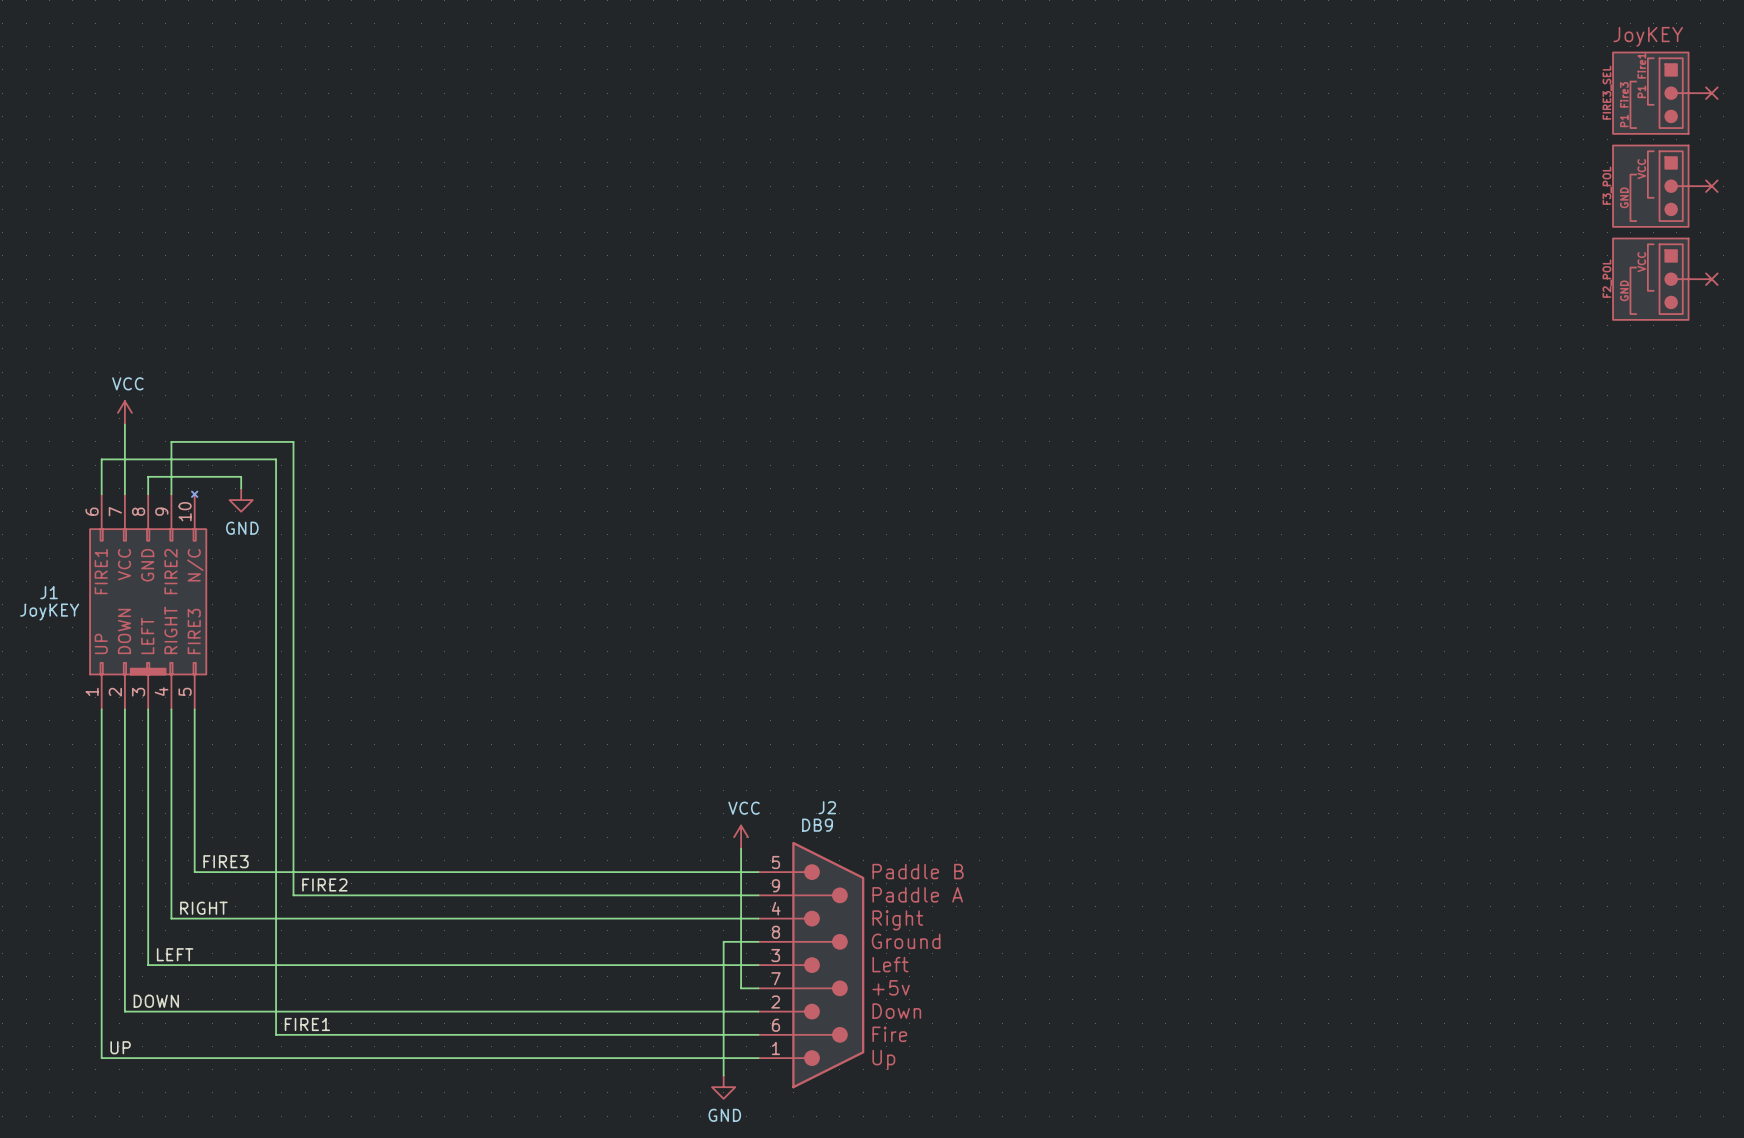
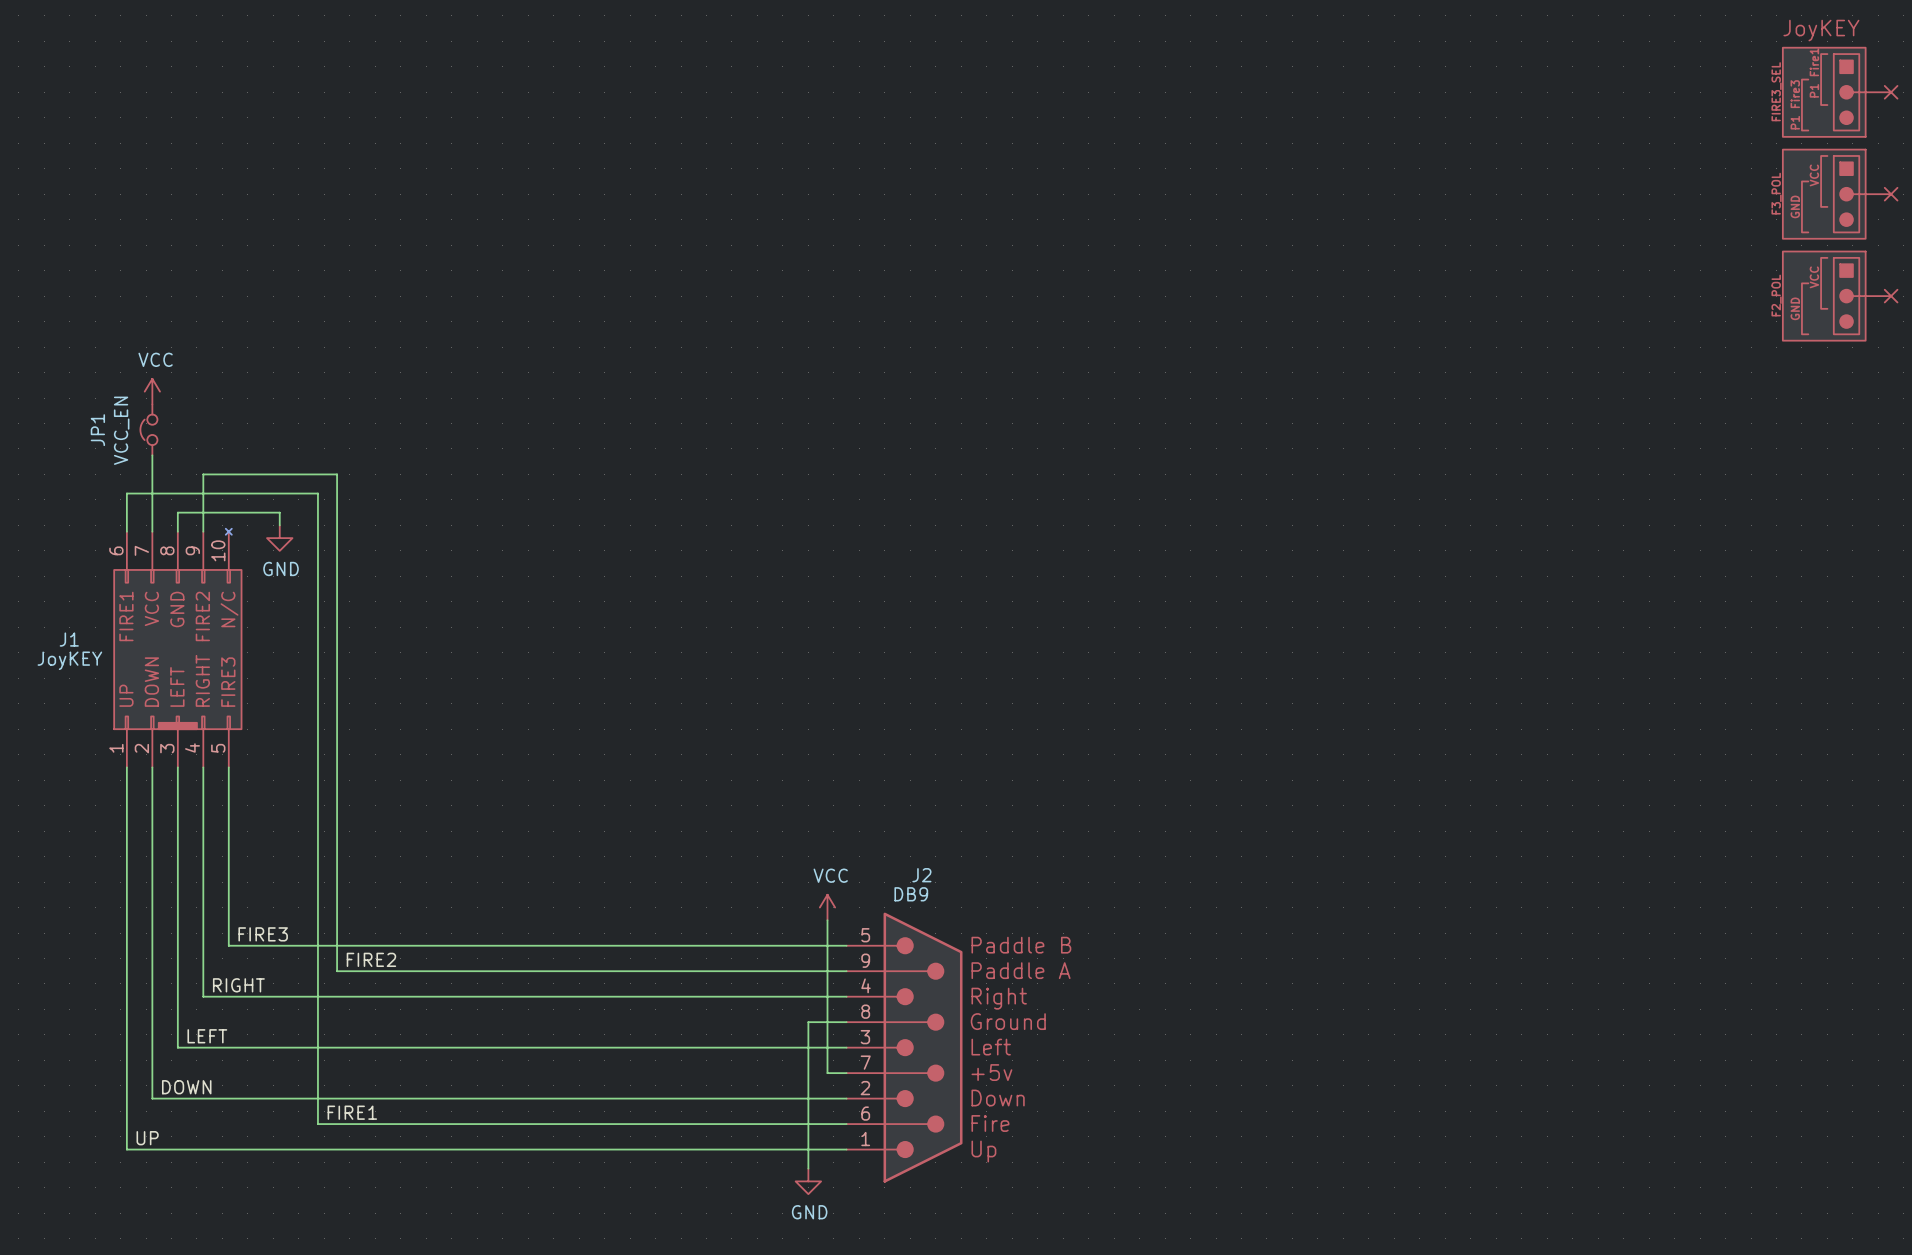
JP1: none -> VCC_EN (148, 429)
power symbol position: VCC (124, 412) -> VCC (152, 391)

